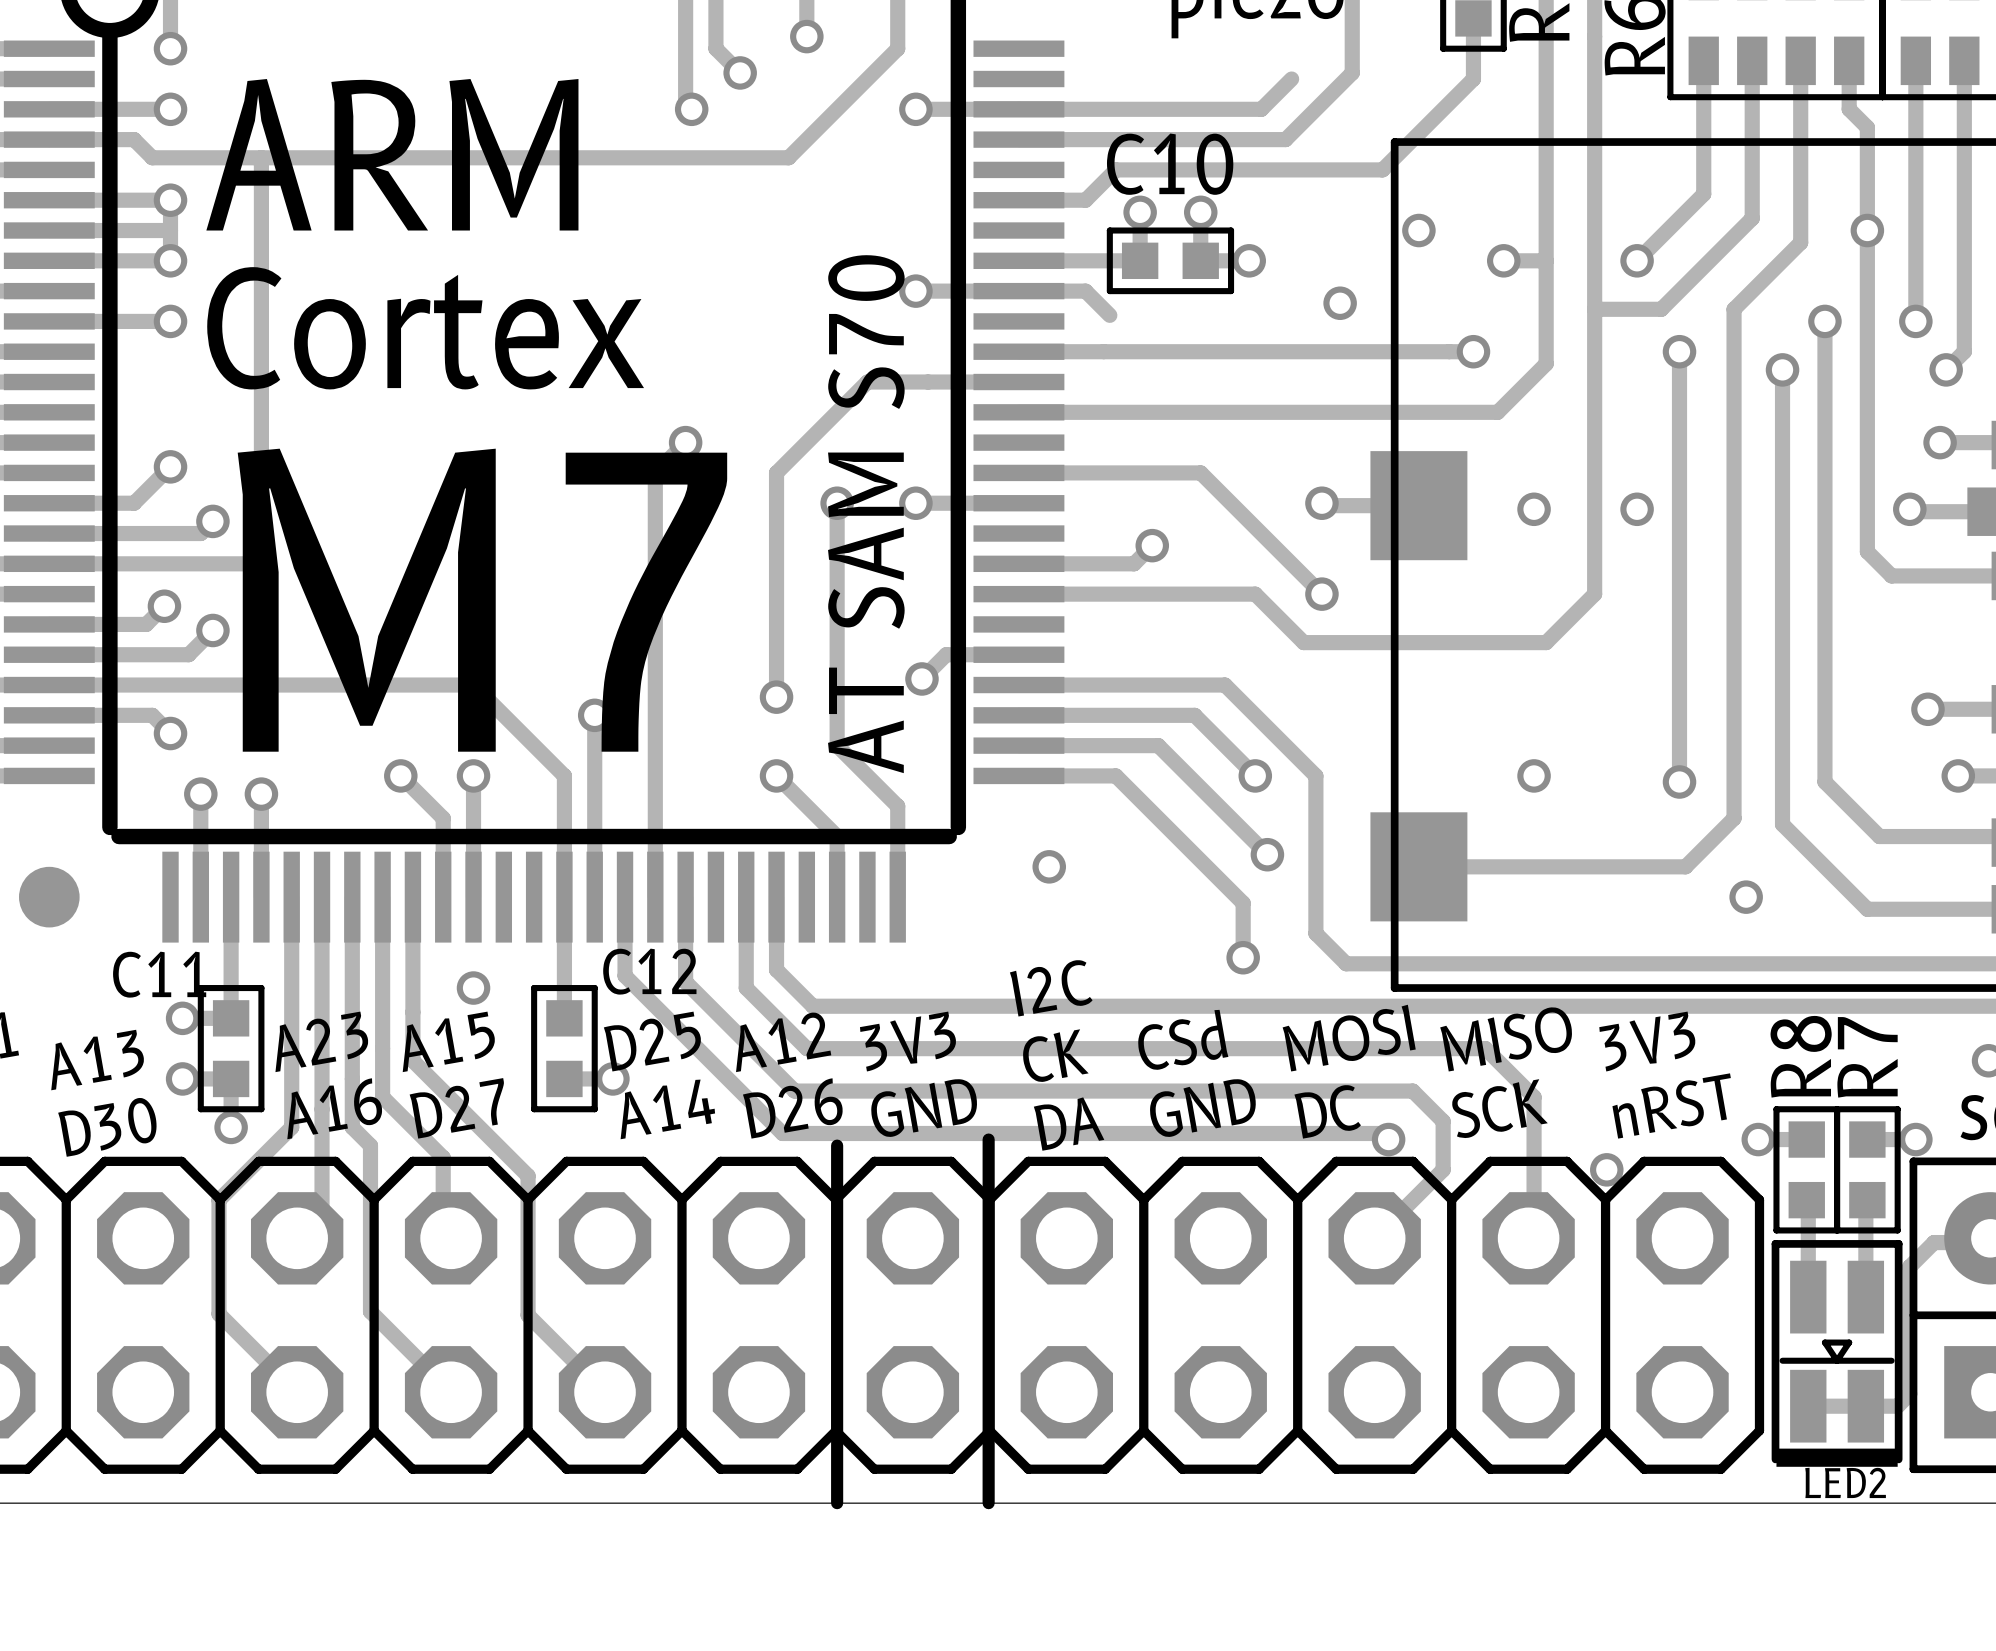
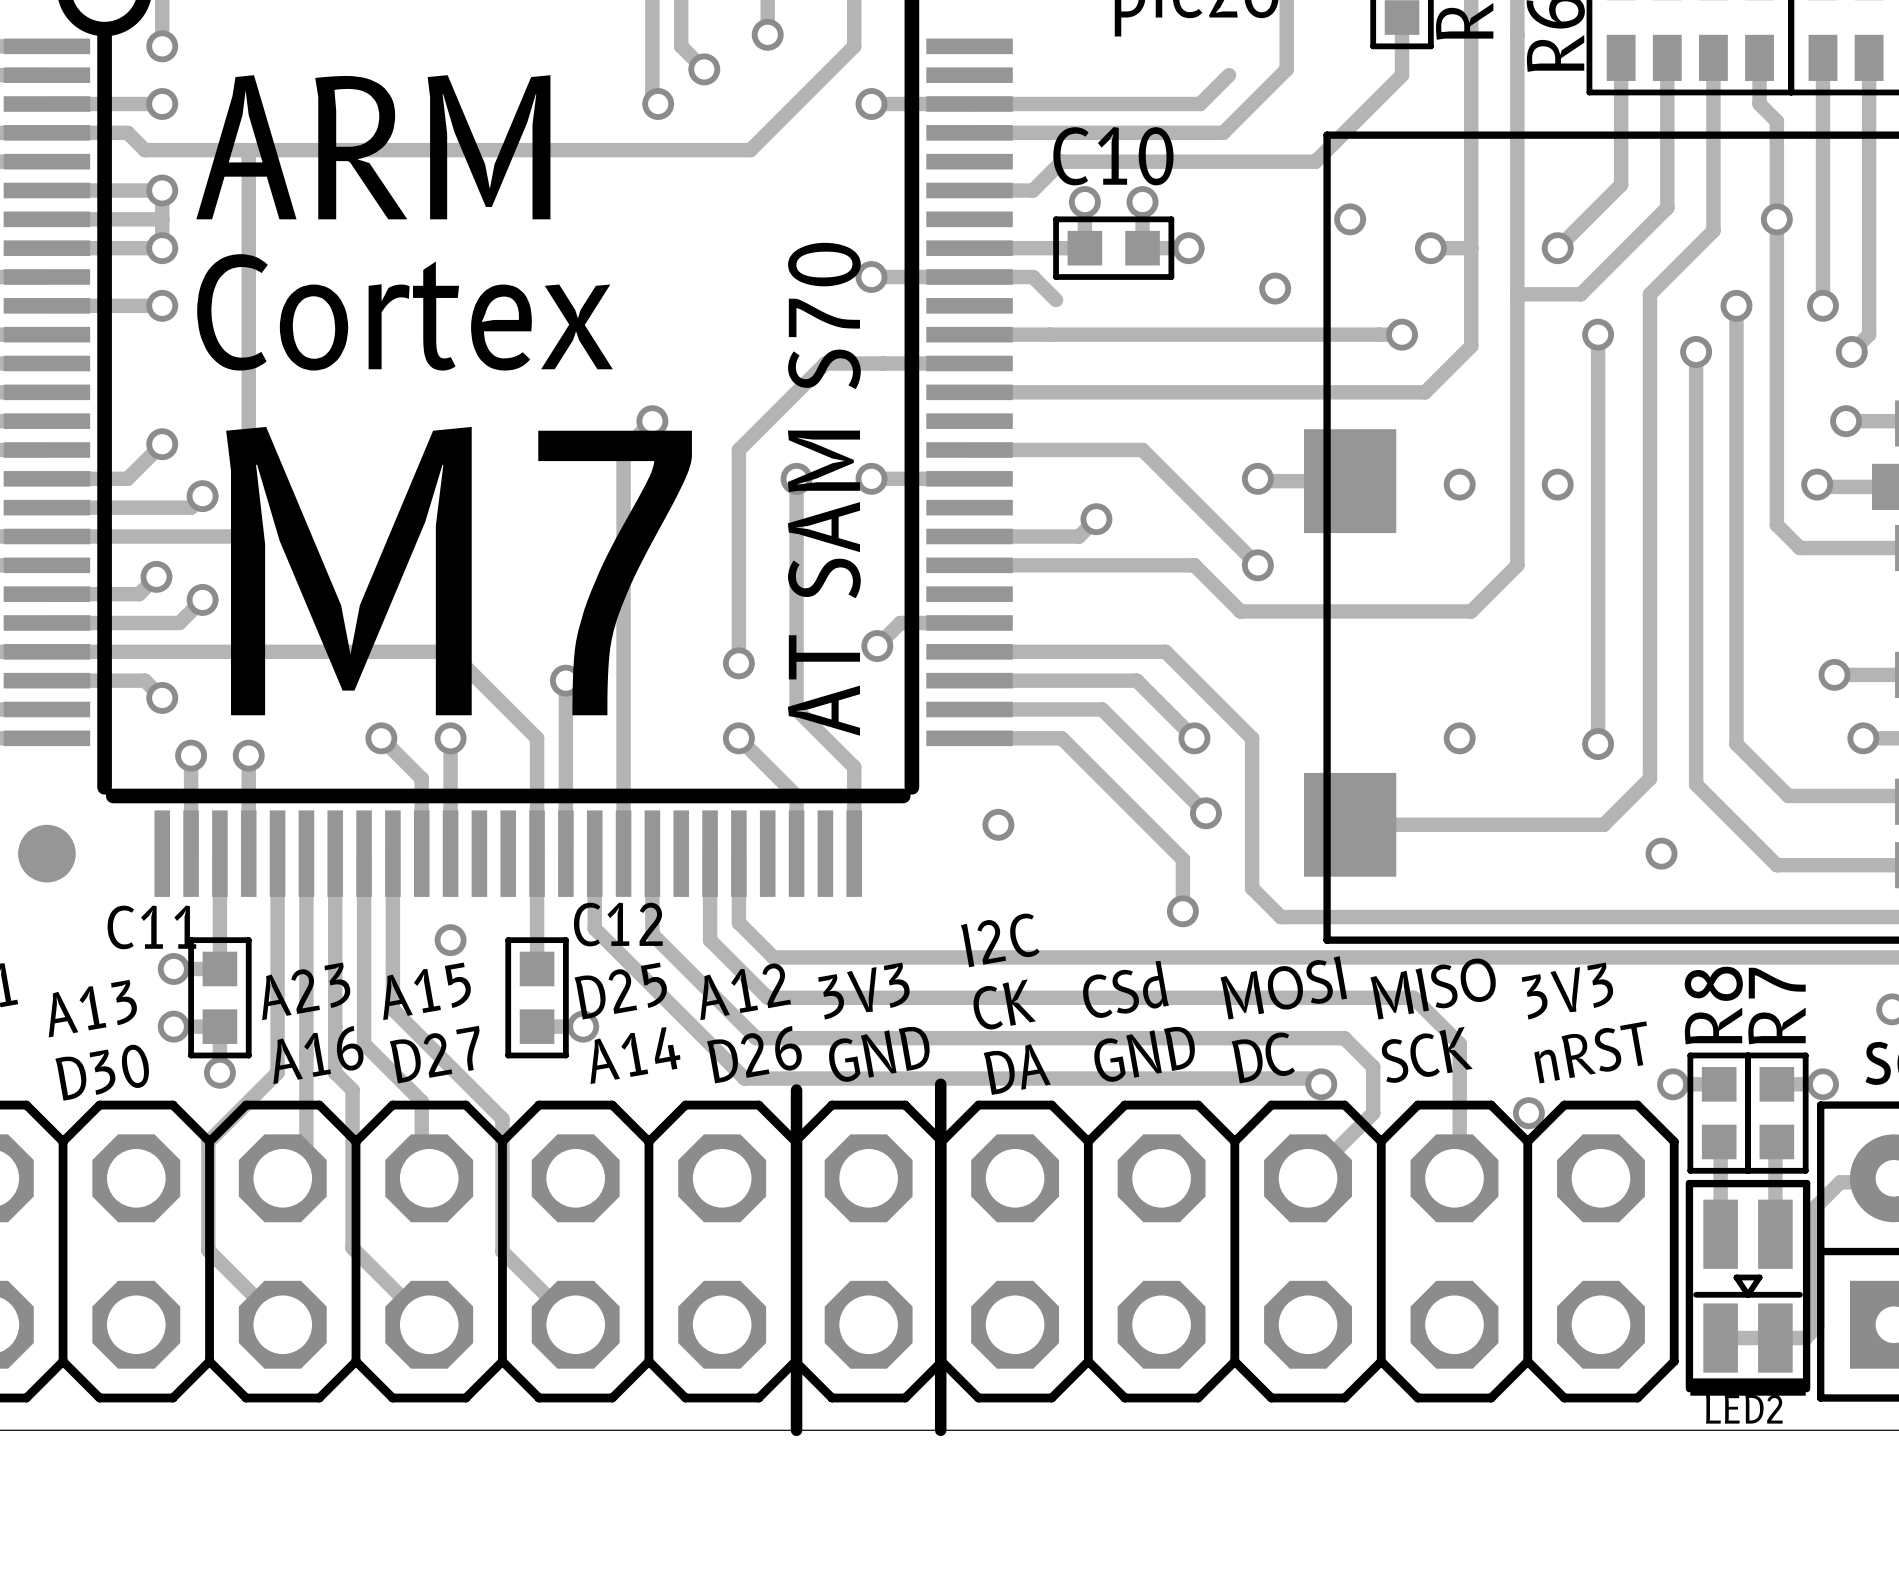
LED2 name position: LED2 (1845, 1482) -> LED2 (1744, 1409)

